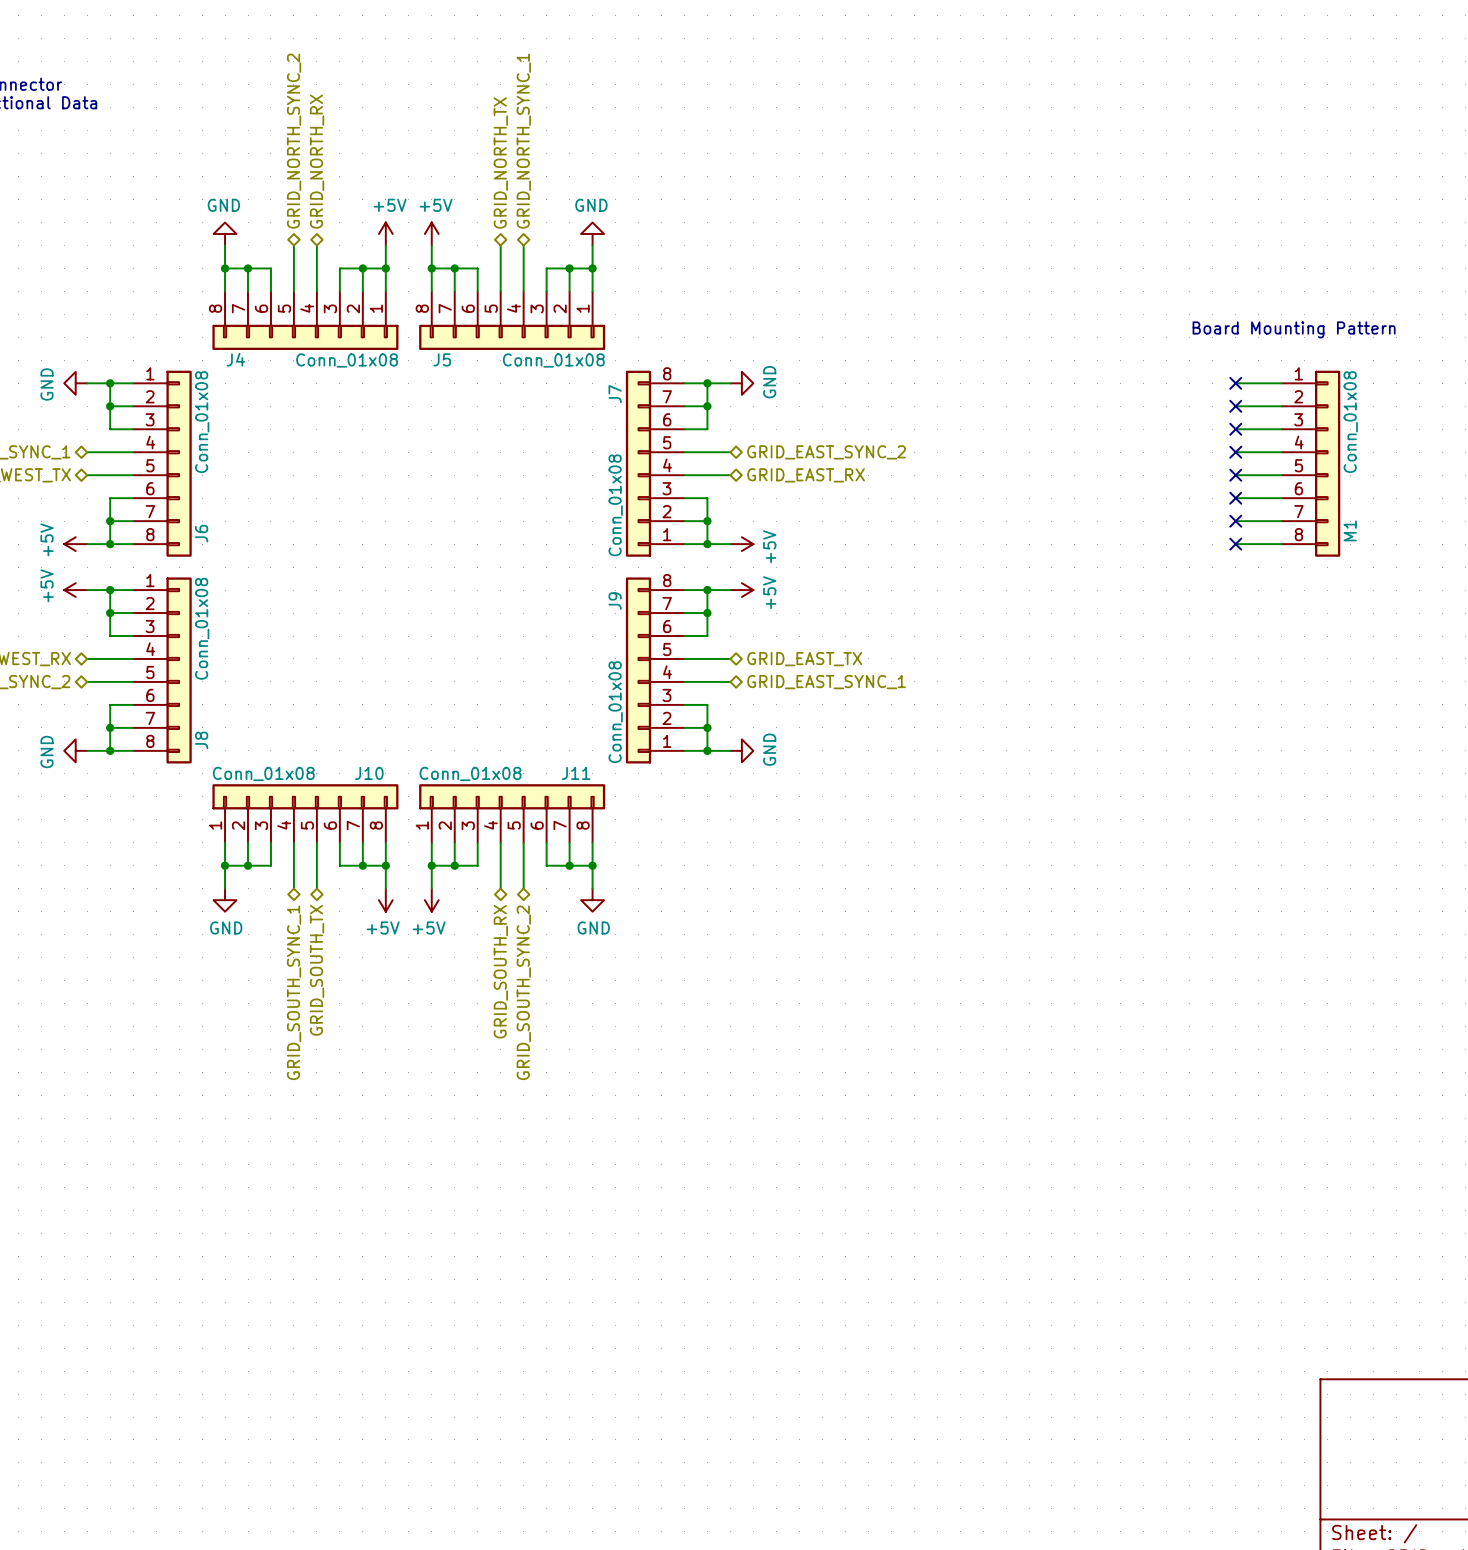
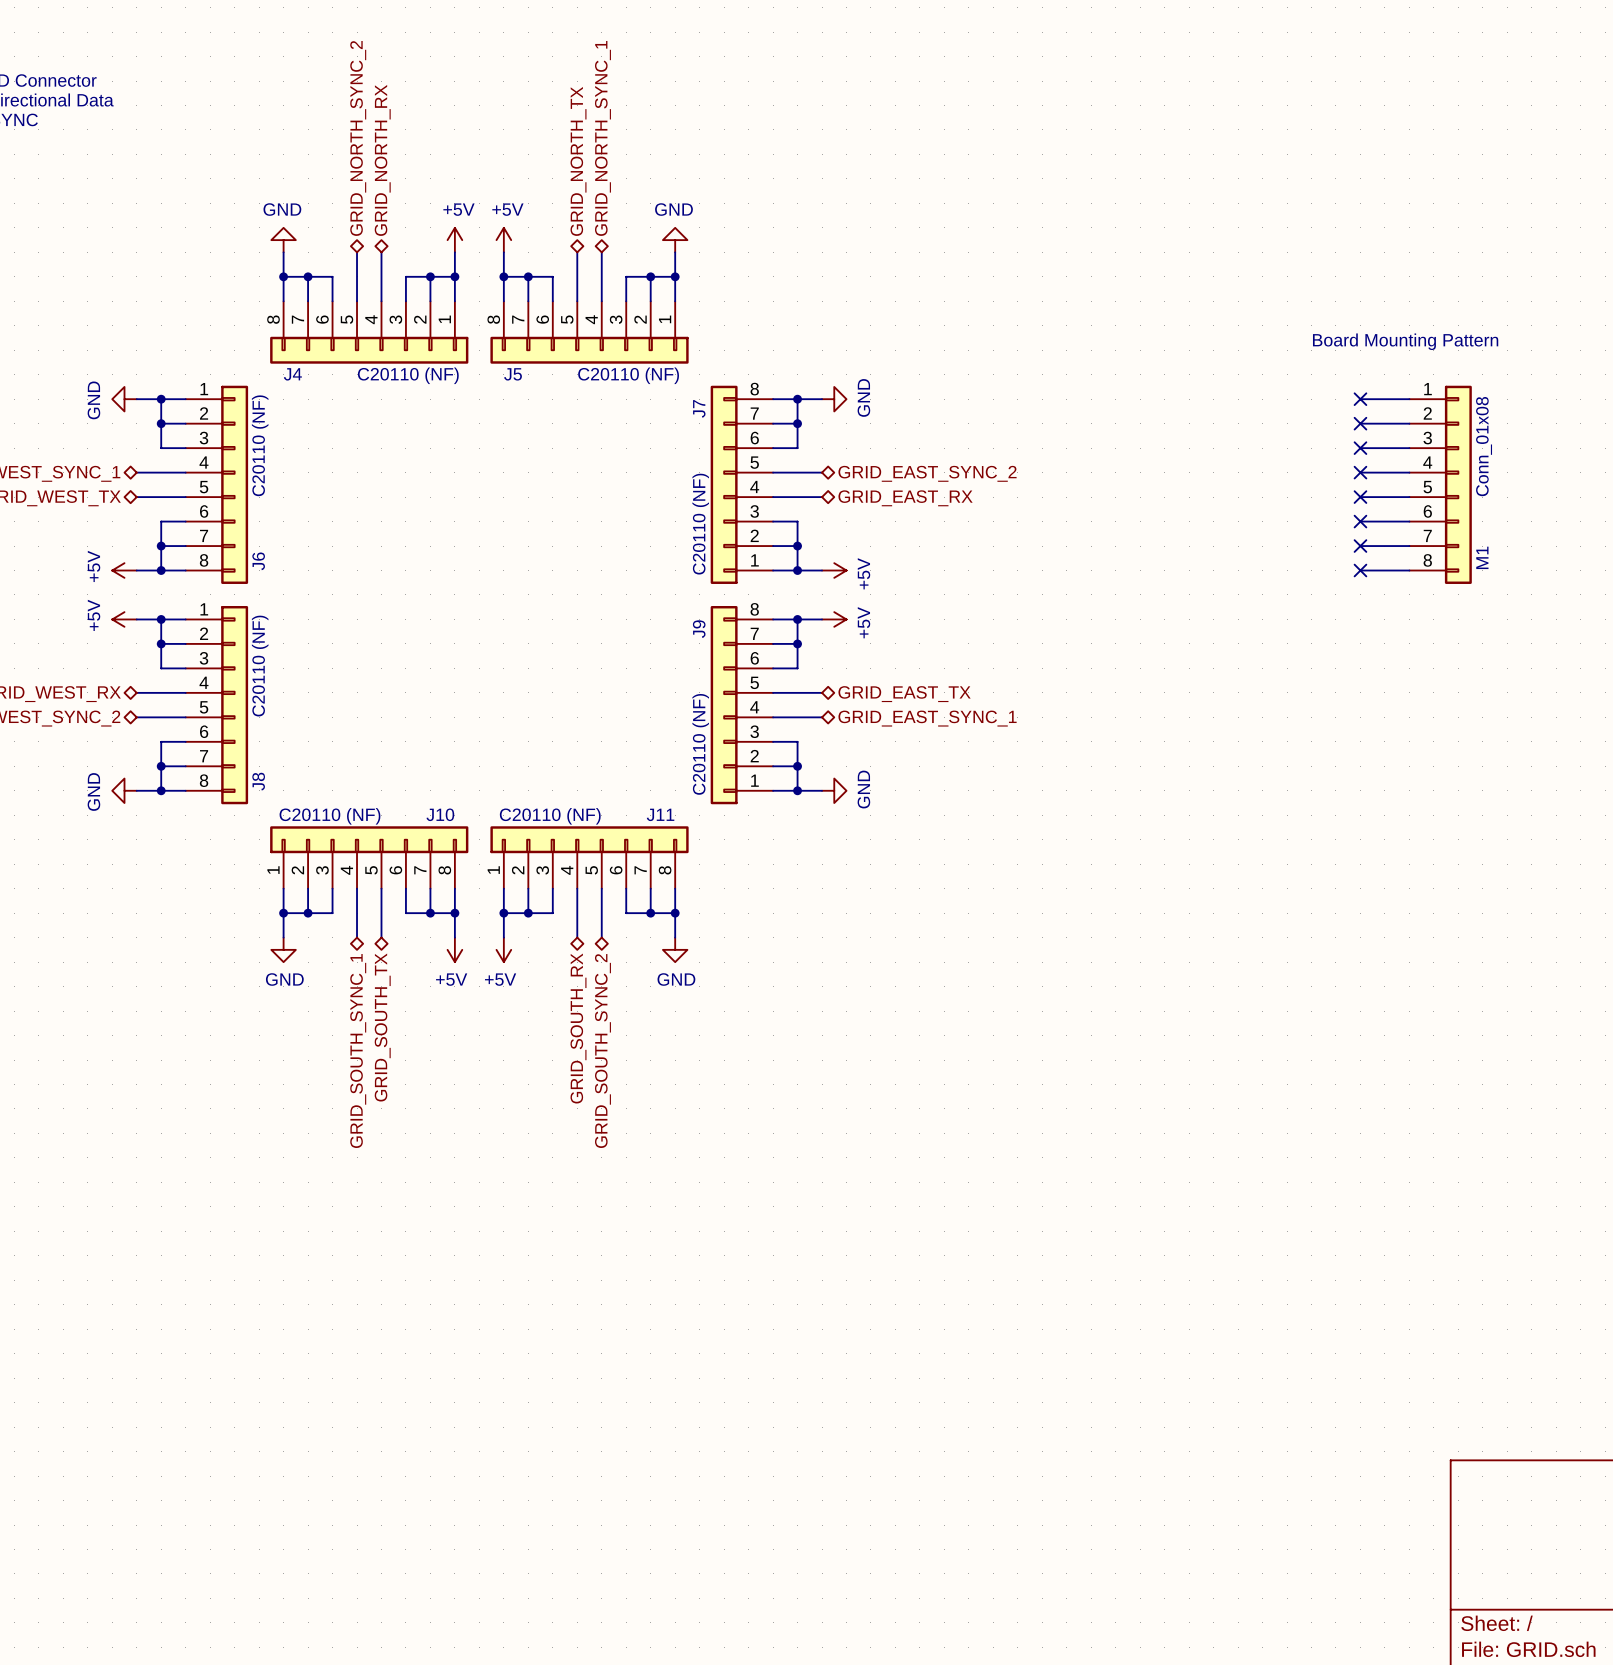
J4 value: Conn_01x08 (347, 360) -> C20110 (NF) (408, 375)
J5 value: Conn_01x08 (553, 360) -> C20110 (NF) (628, 375)
J6 value: Conn_01x08 (202, 422) -> C20110 (NF) (260, 445)
J7 value: Conn_01x08 (615, 505) -> C20110 (NF) (700, 524)
J8 value: Conn_01x08 (202, 628) -> C20110 (NF) (260, 666)
J9 value: Conn_01x08 (615, 712) -> C20110 (NF) (700, 744)
J10 value: Conn_01x08 (263, 773) -> C20110 (NF) (329, 816)
J11 value: Conn_01x08 (470, 773) -> C20110 (NF) (550, 816)

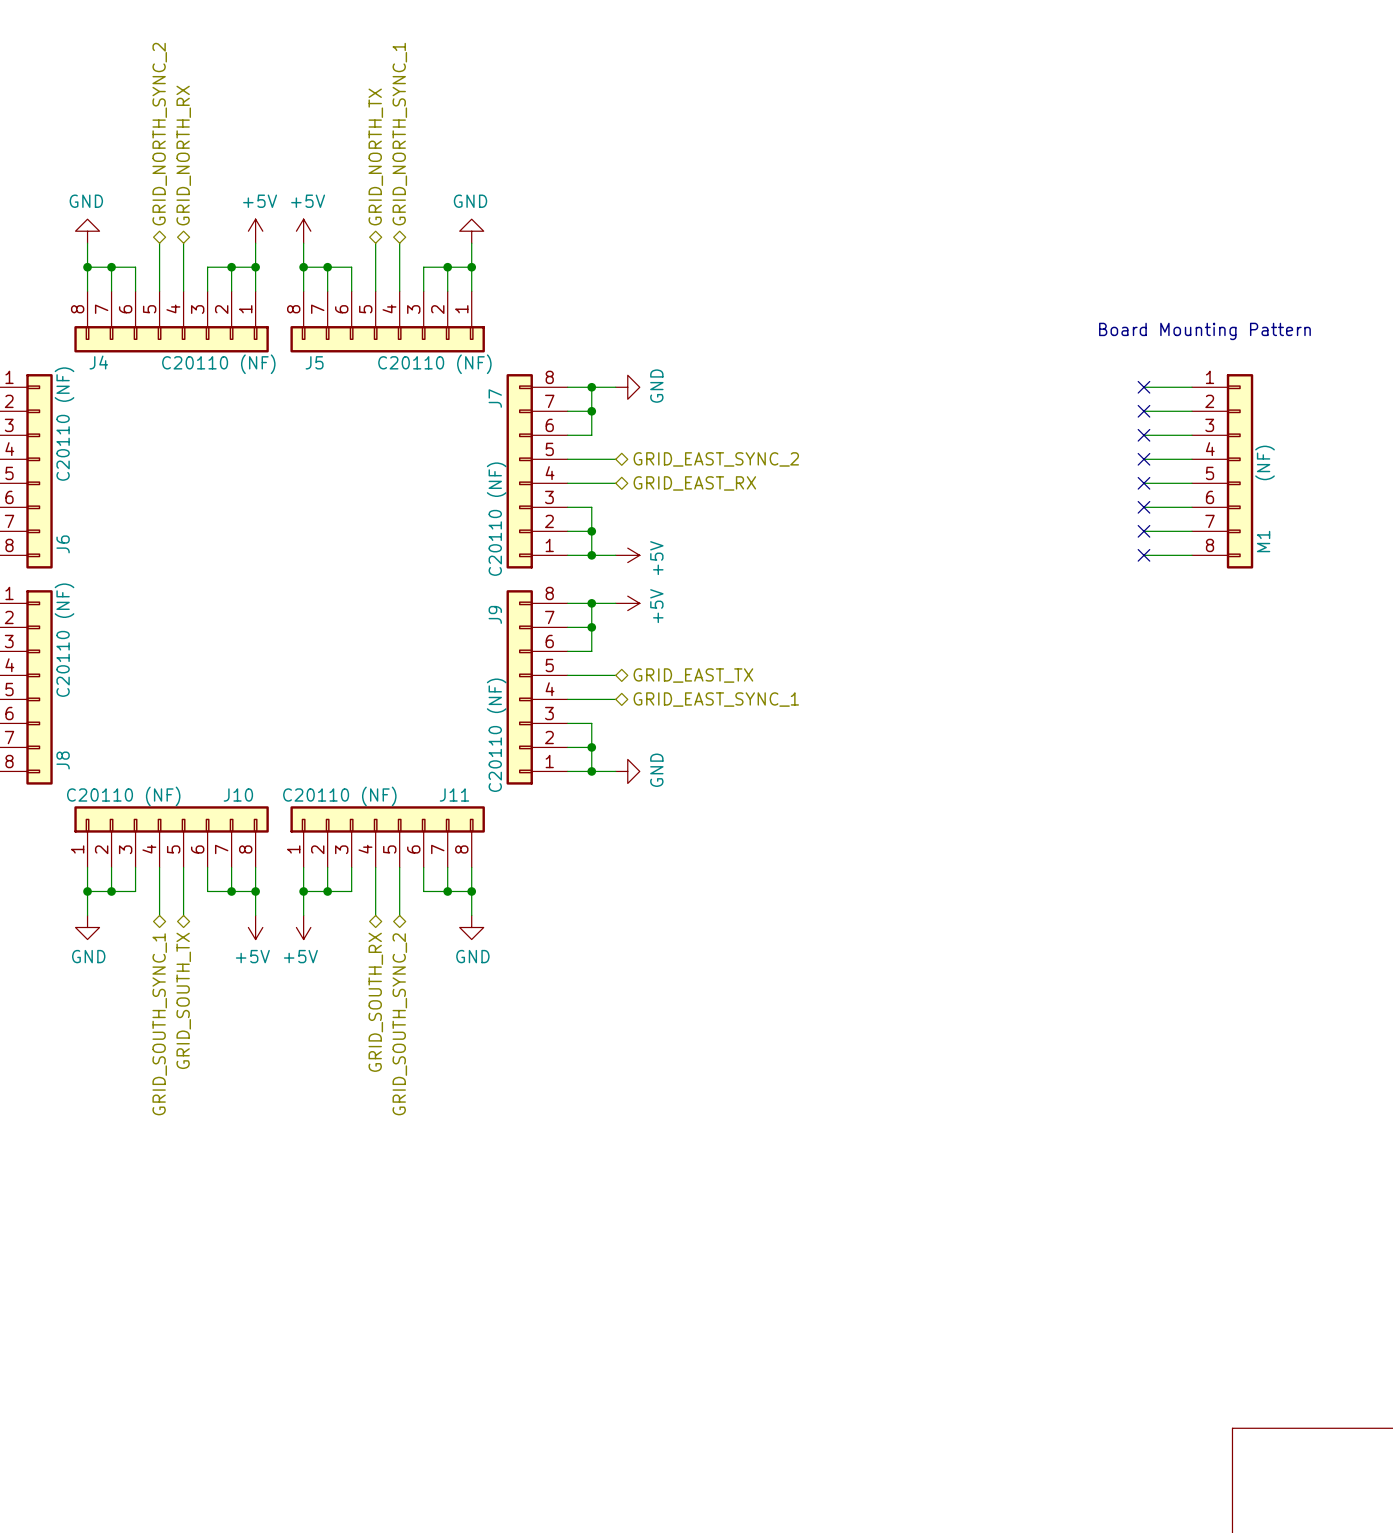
M1 value: Conn_01x08 (1484, 446) -> (NF) (1265, 462)

